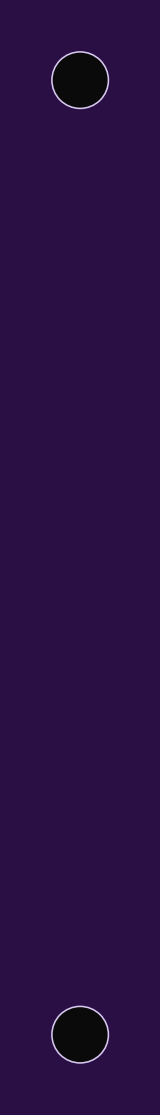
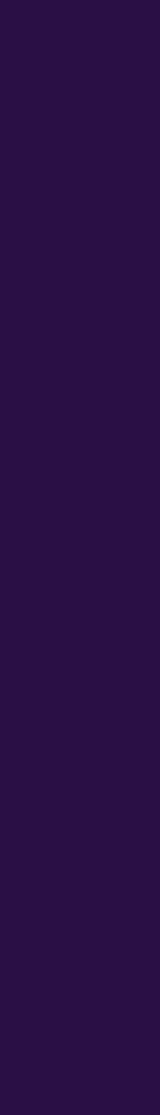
hole: (80, 80) -> none
hole: (80, 1034) -> none

